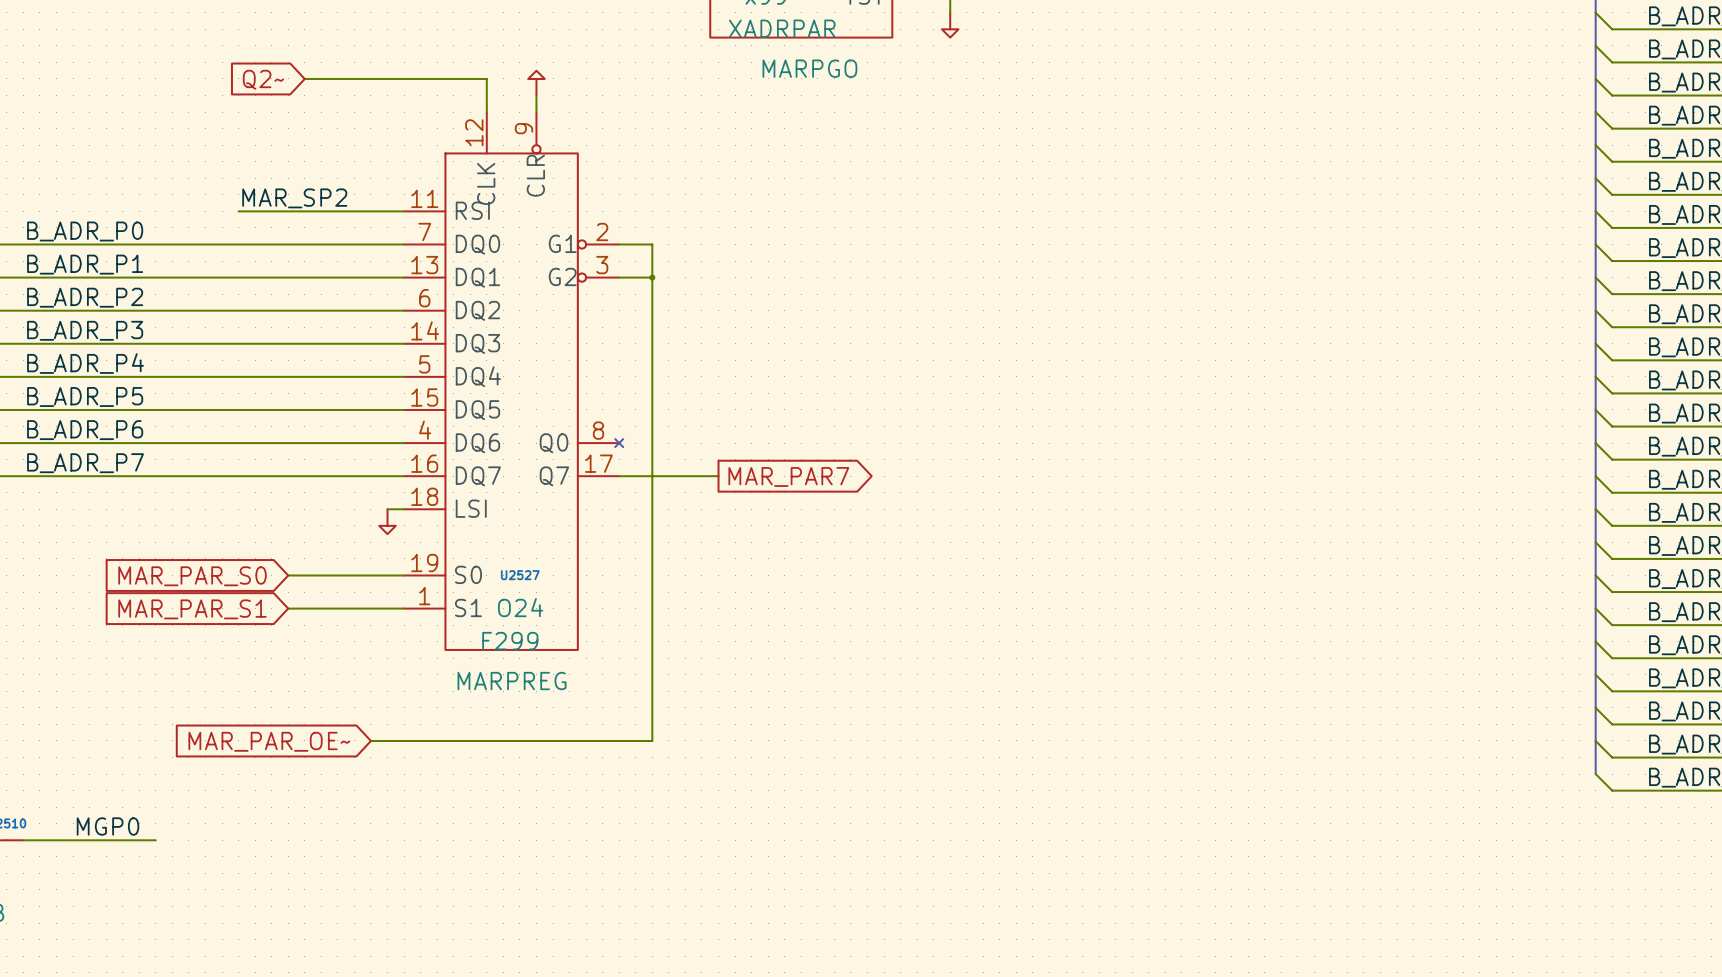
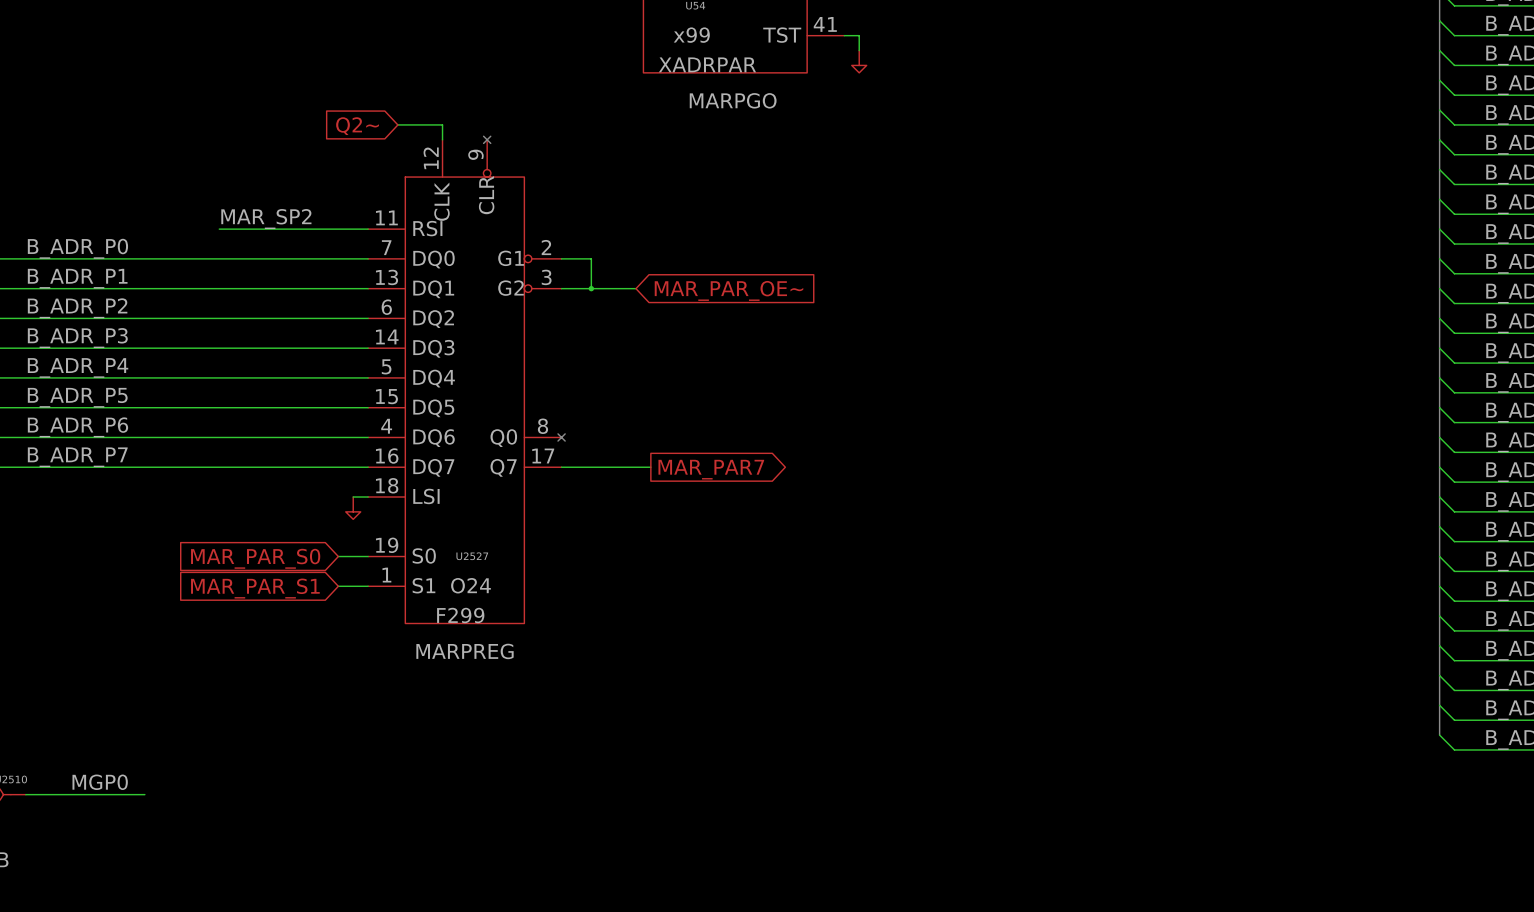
wire: (304, 78) (486, 78) (486, 95) -> (397, 124) (442, 124)
global label position: Q2~ (263, 79) -> Q2~ (357, 126)
power symbol: (536, 82) -> none
wire: (536, 95) (536, 112) -> none
no-connect mark: none -> (487, 139)
wire: (652, 277) (652, 740) (370, 740) -> (591, 288) (635, 288)
global label: none -> MAR_PAR_OE~ (729, 290)
wire: (288, 575) (370, 575) -> none
global label position: MAR_PAR_S0 (192, 576) -> MAR_PAR_S0 (255, 558)
wire: (288, 608) (370, 608) -> none
global label position: MAR_PAR_S1 (192, 609) -> MAR_PAR_S1 (255, 588)
global label: MAR_PAR_OE~ (269, 741) -> none

